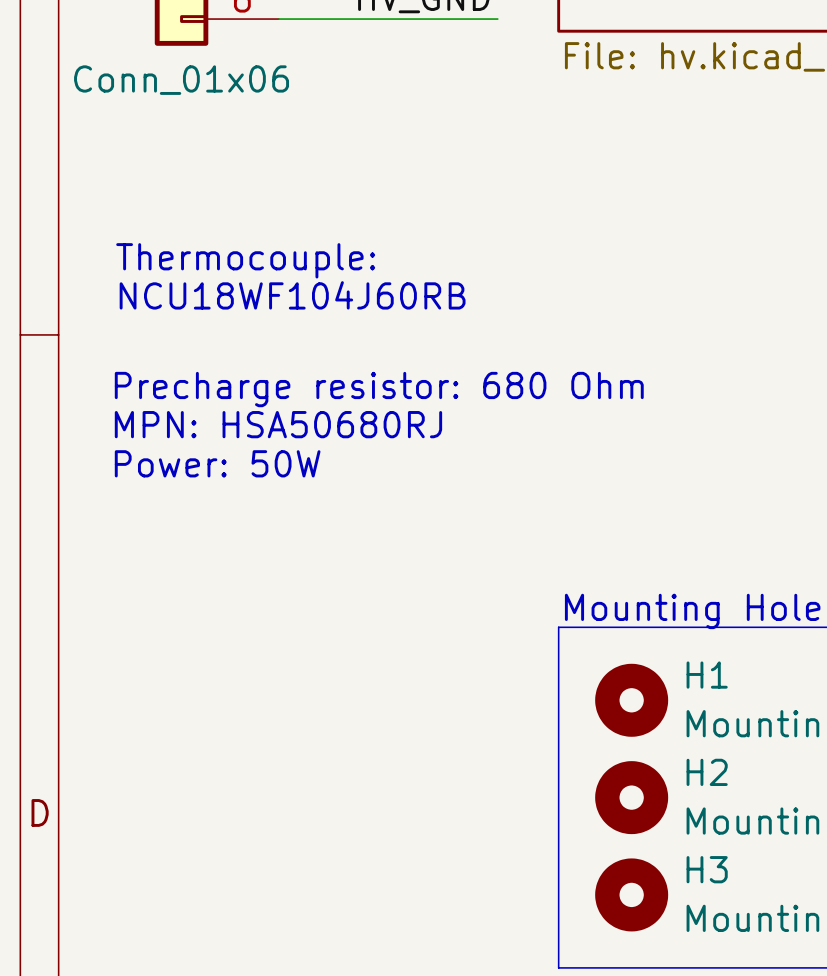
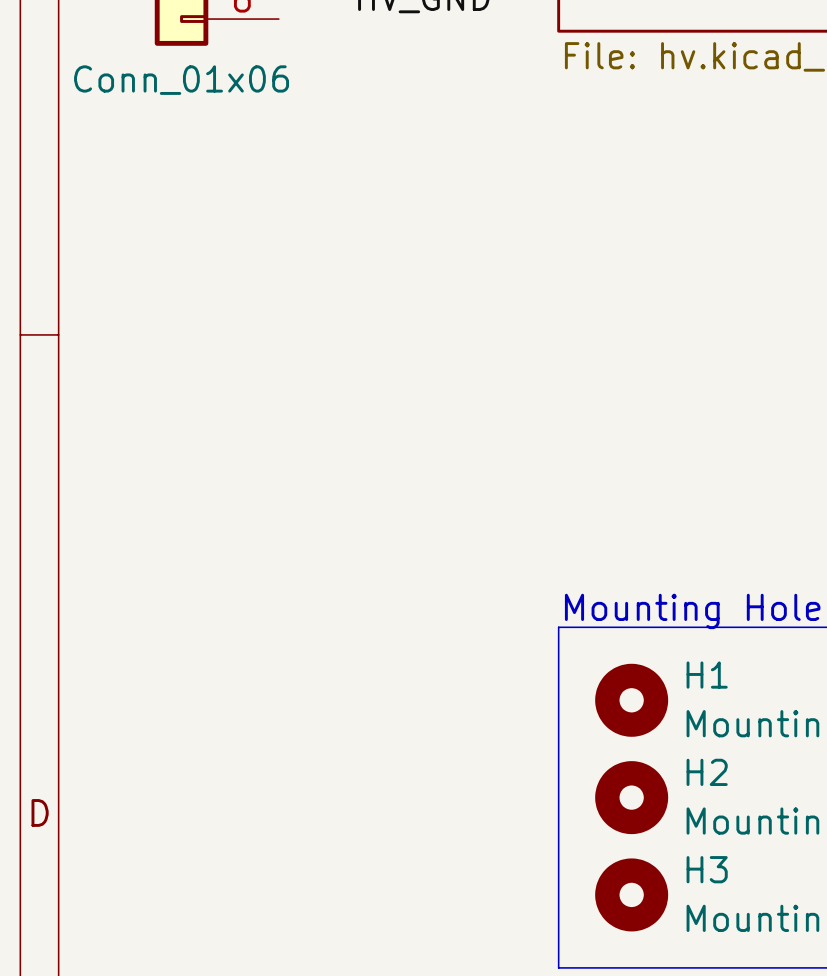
wire: (278, 19) (497, 19) -> none
text: Thermocouple: (245, 260) -> none
text: NCU18WF104J60RB (292, 295) -> none
text: Precharge resistor: 680 Ohm (379, 389) -> none
text: MPN: HSA50680RJ (278, 424) -> none
text: Power: 50W (217, 463) -> none

